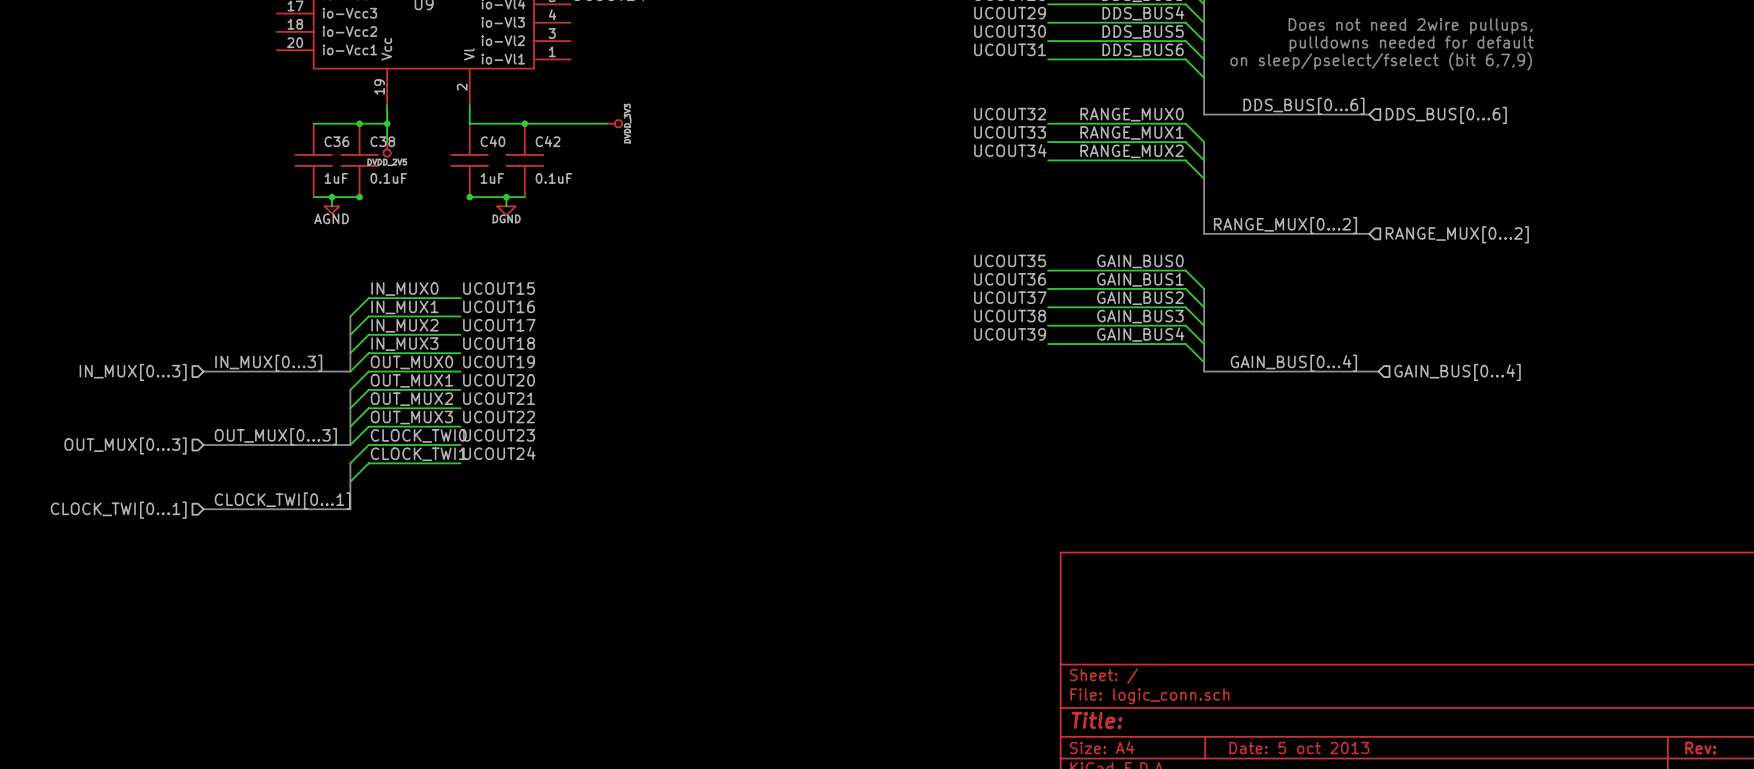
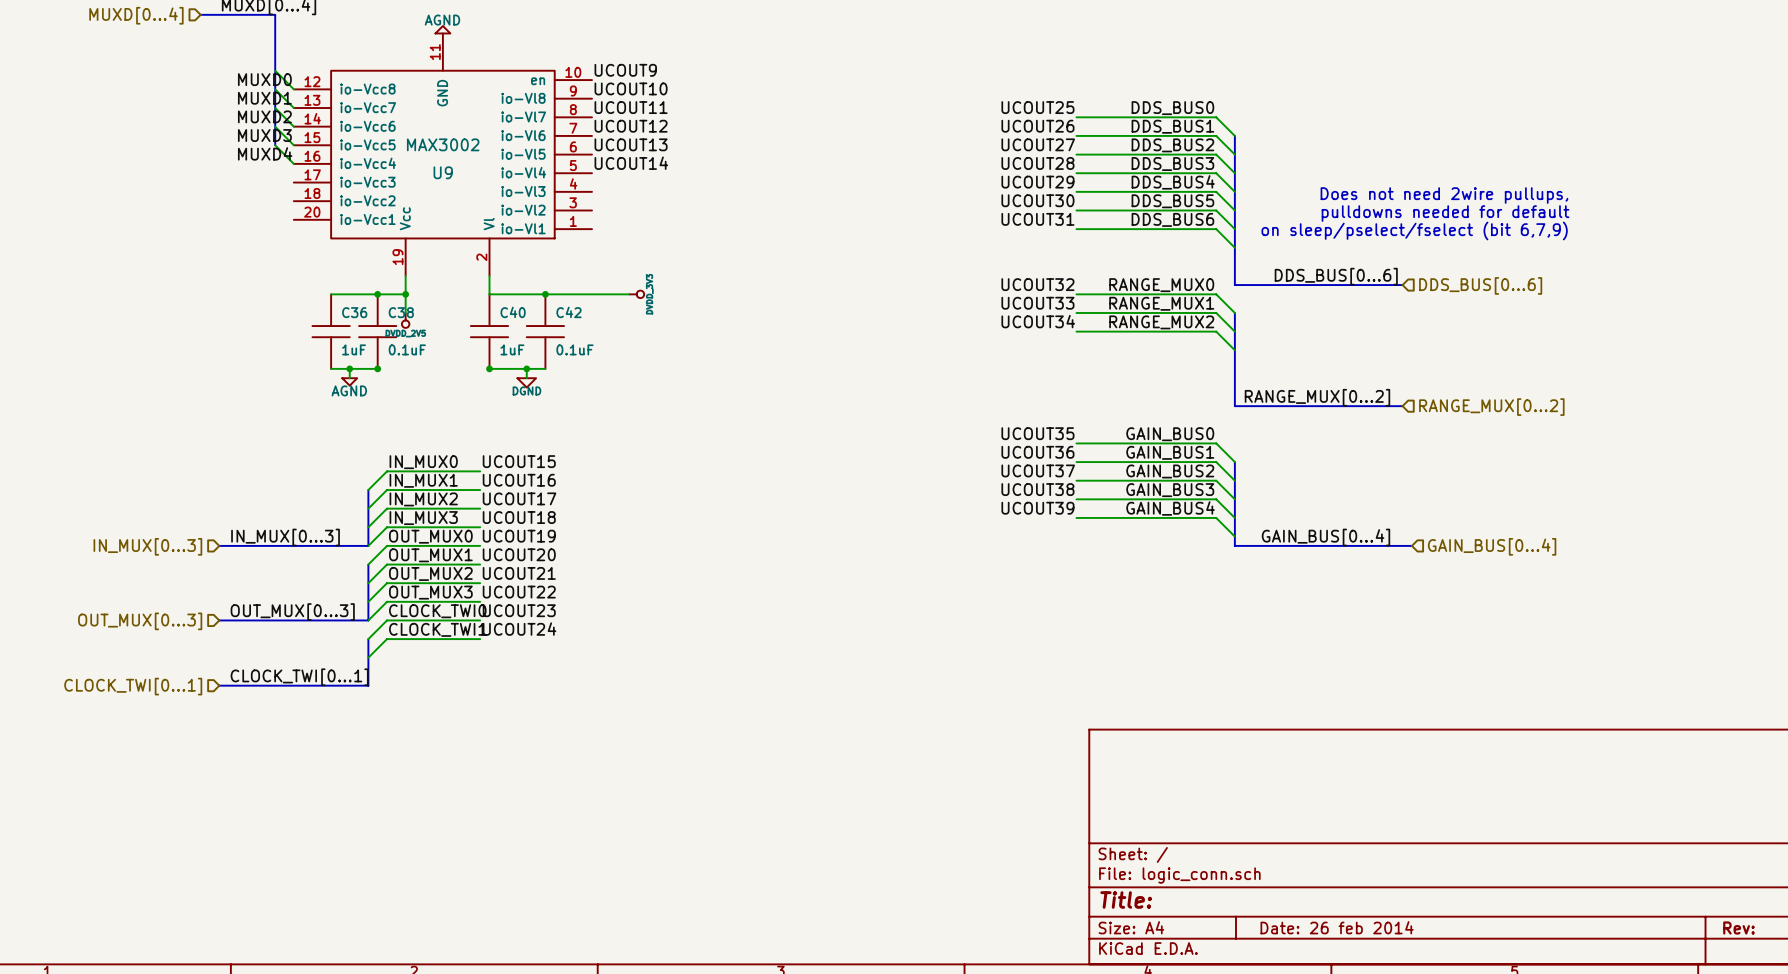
title block: Date: 5 oct 2013 (1299, 748) -> Date: 26 feb 2014 (1337, 927)

